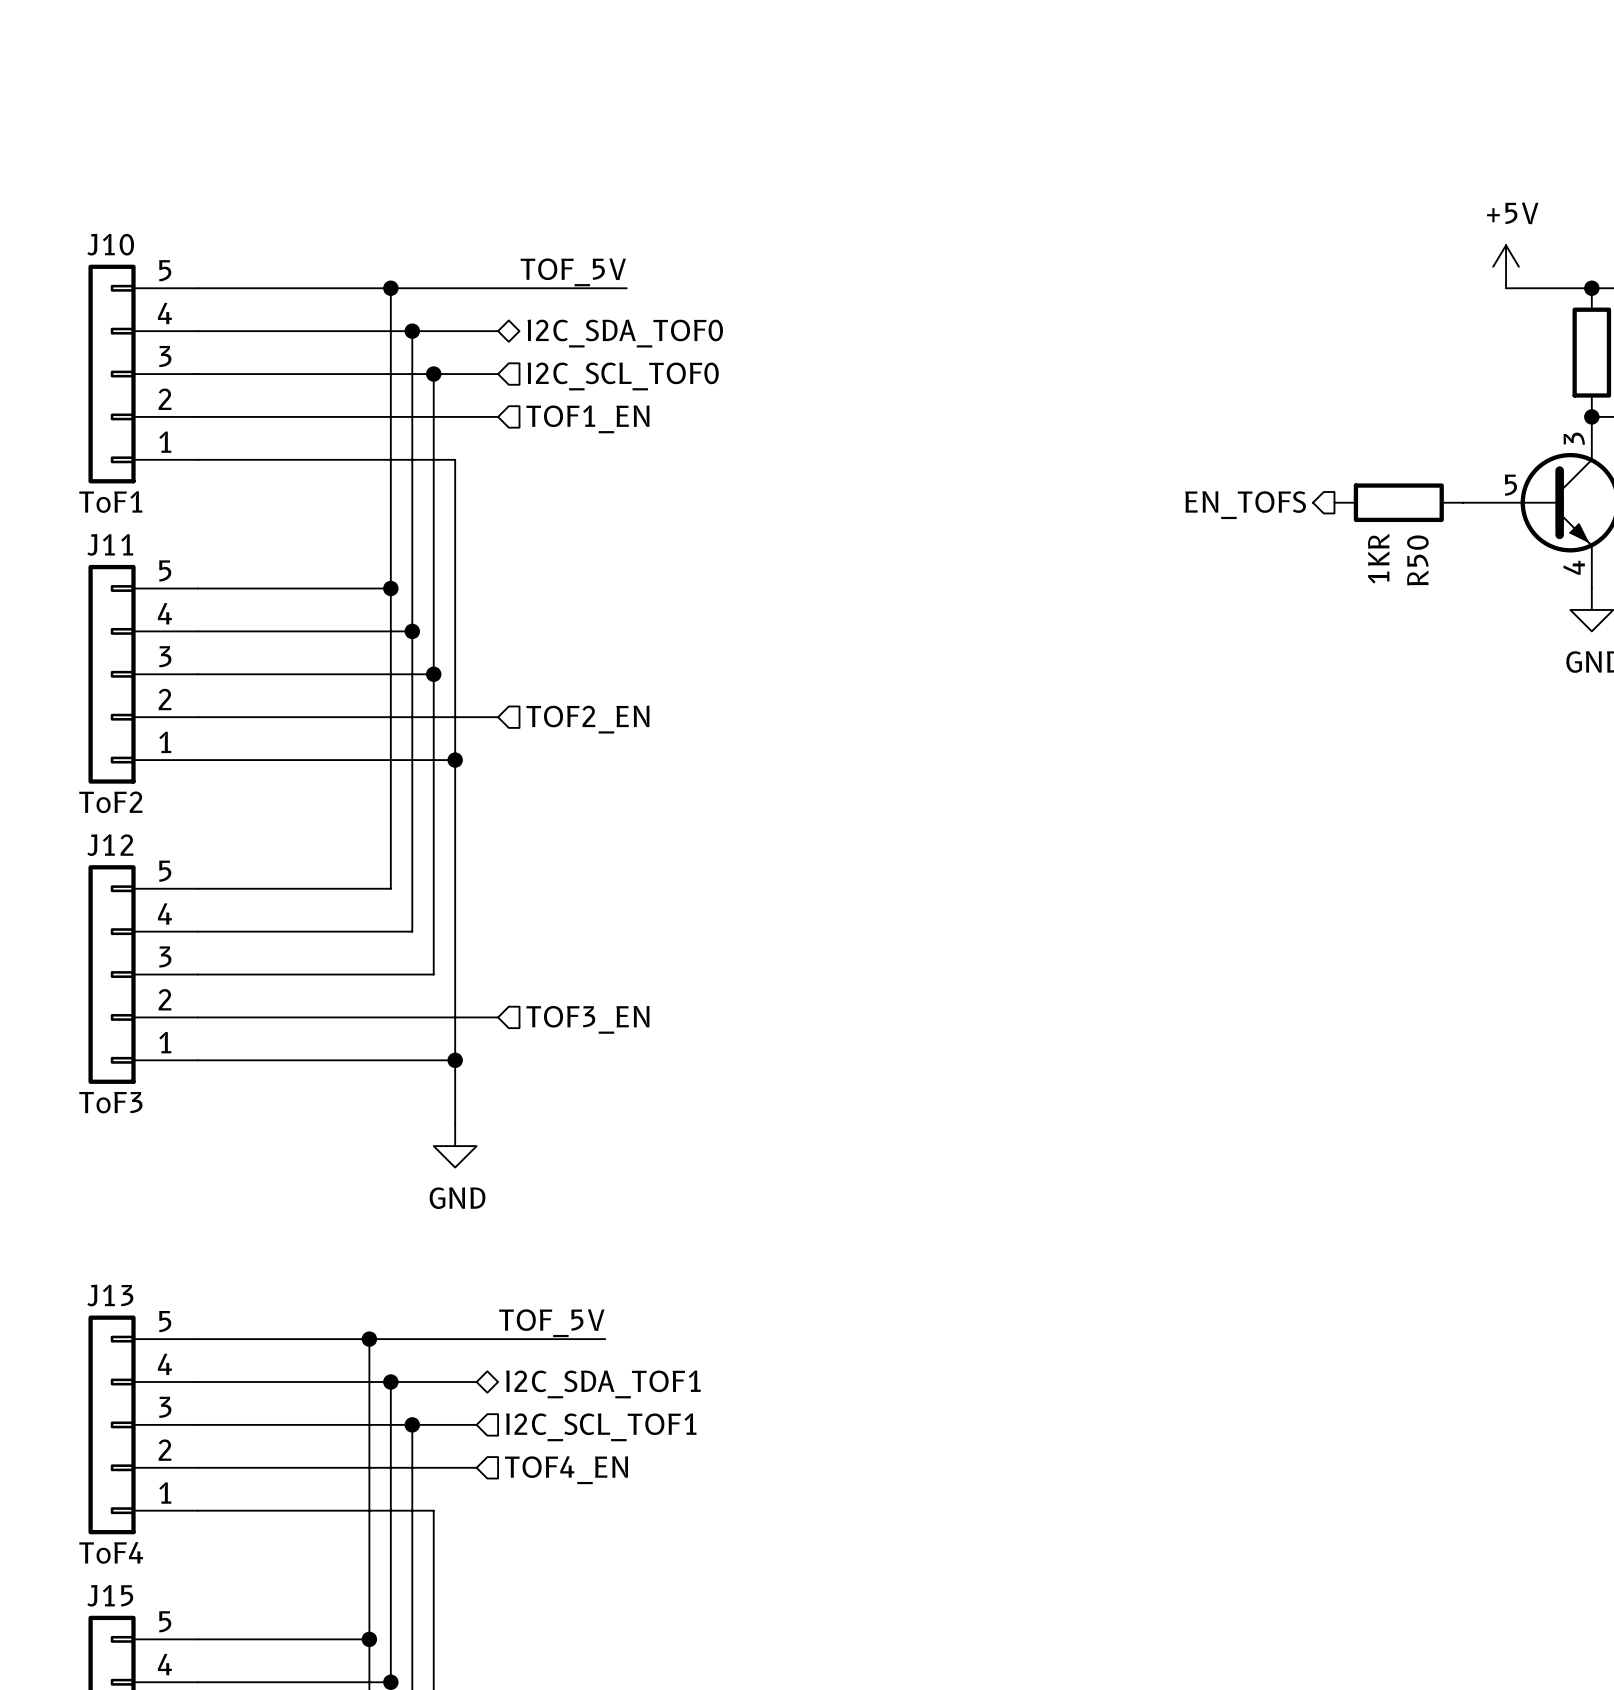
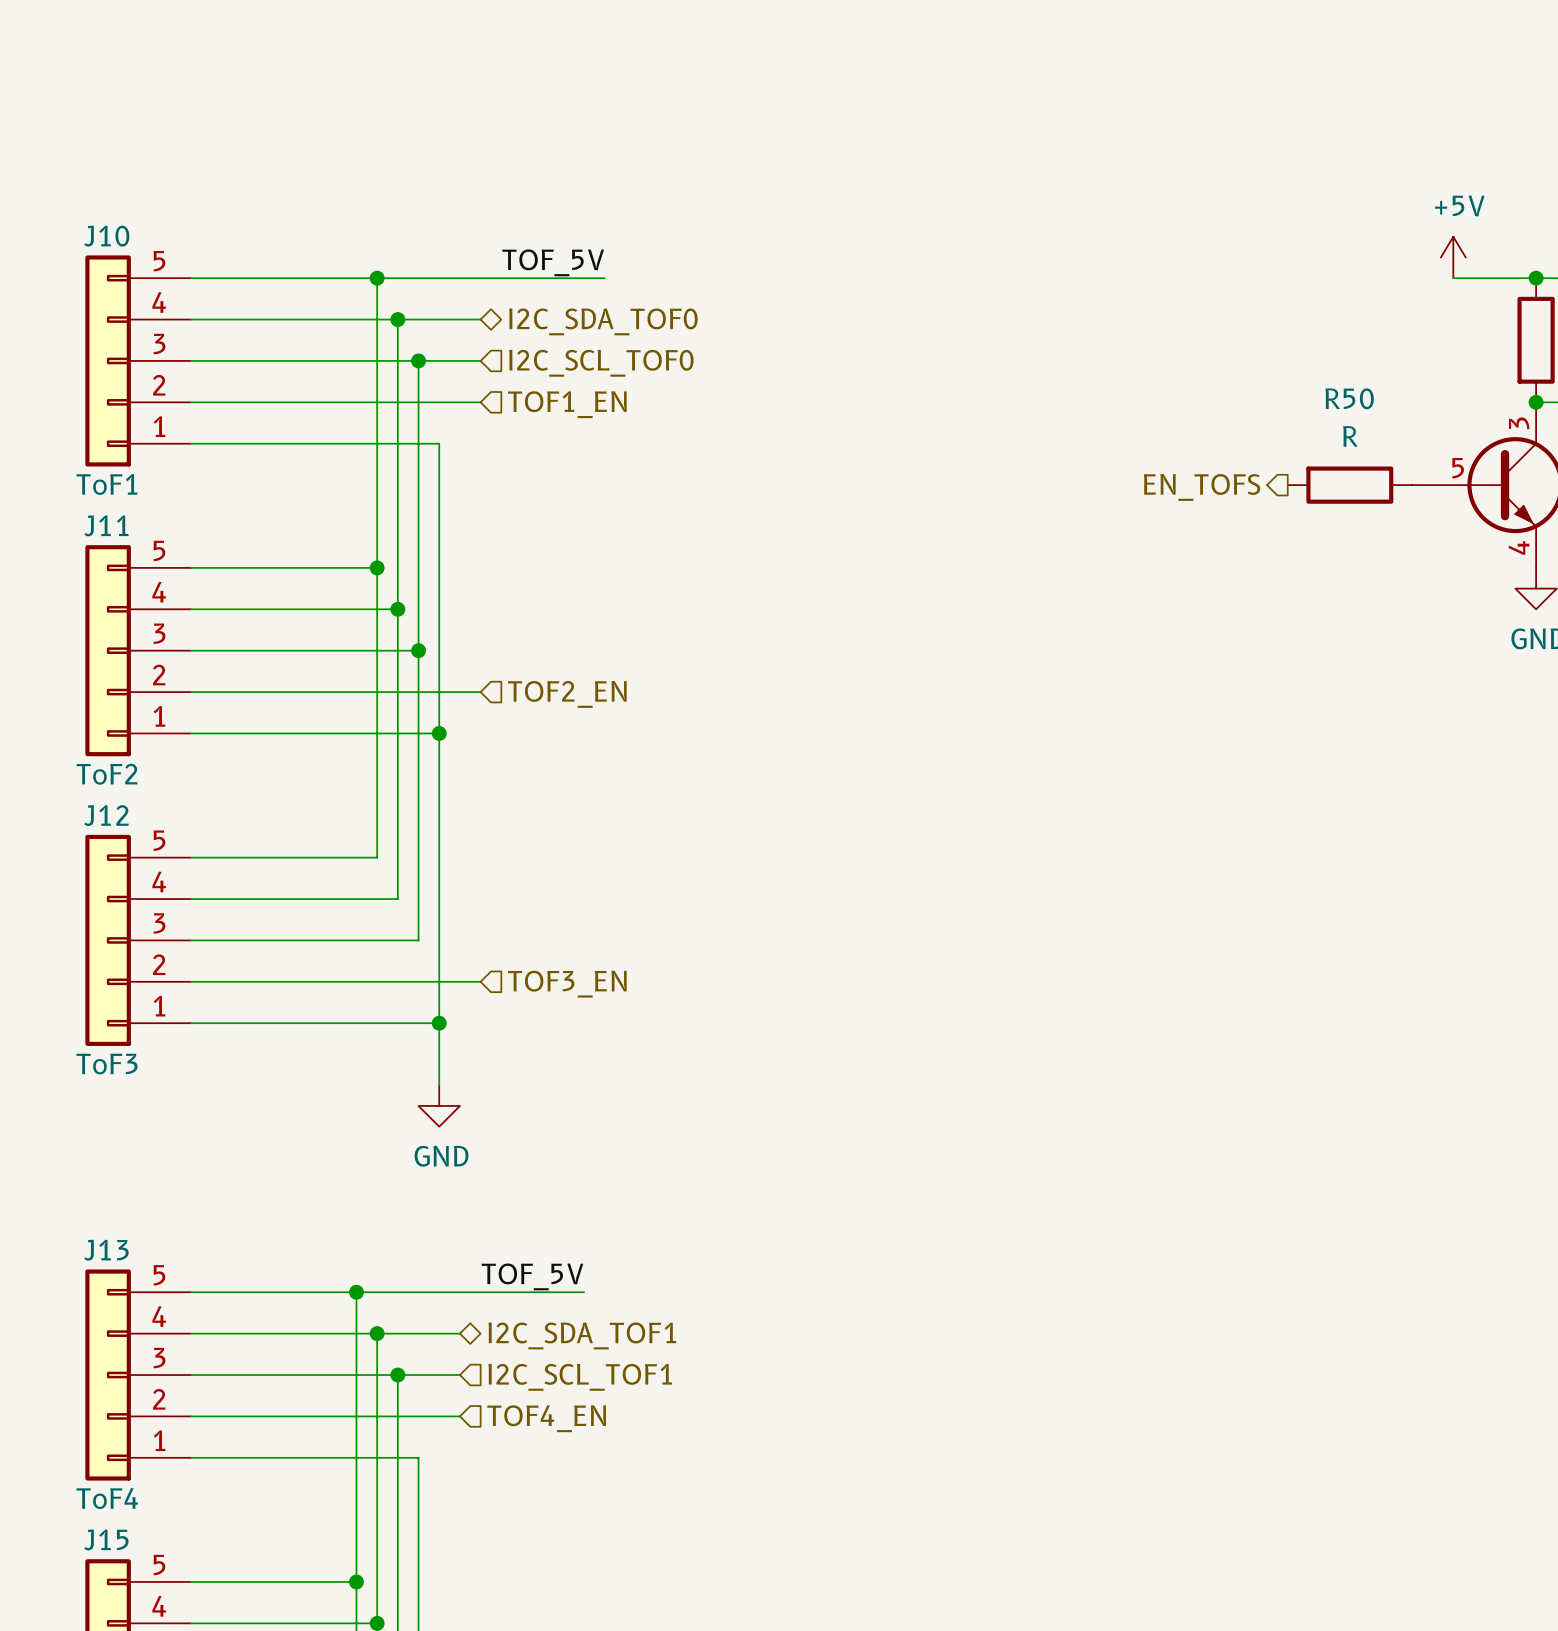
R50 value: 1KR (1378, 558) -> R (1350, 436)
R50 name rotation: 0° (1417, 560) -> 90° clockwise (1349, 398)
R50 name position: R50 (1417, 560) -> R50 (1349, 398)

